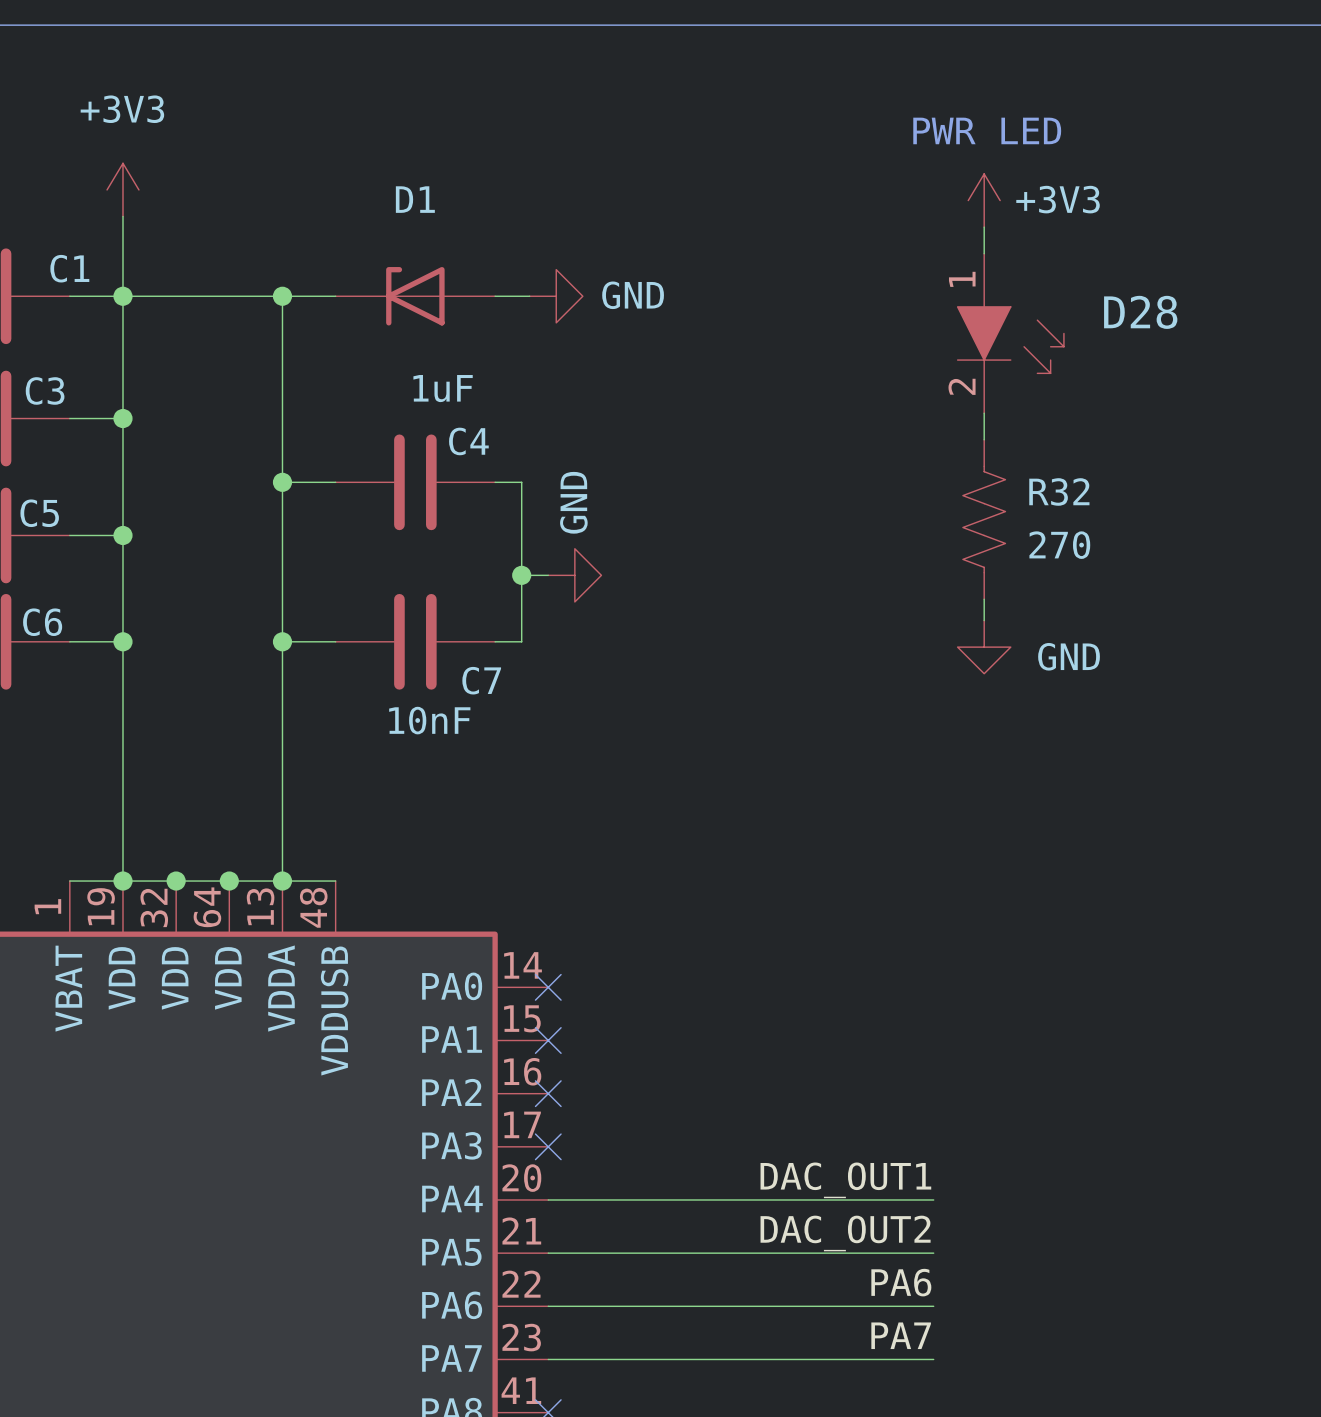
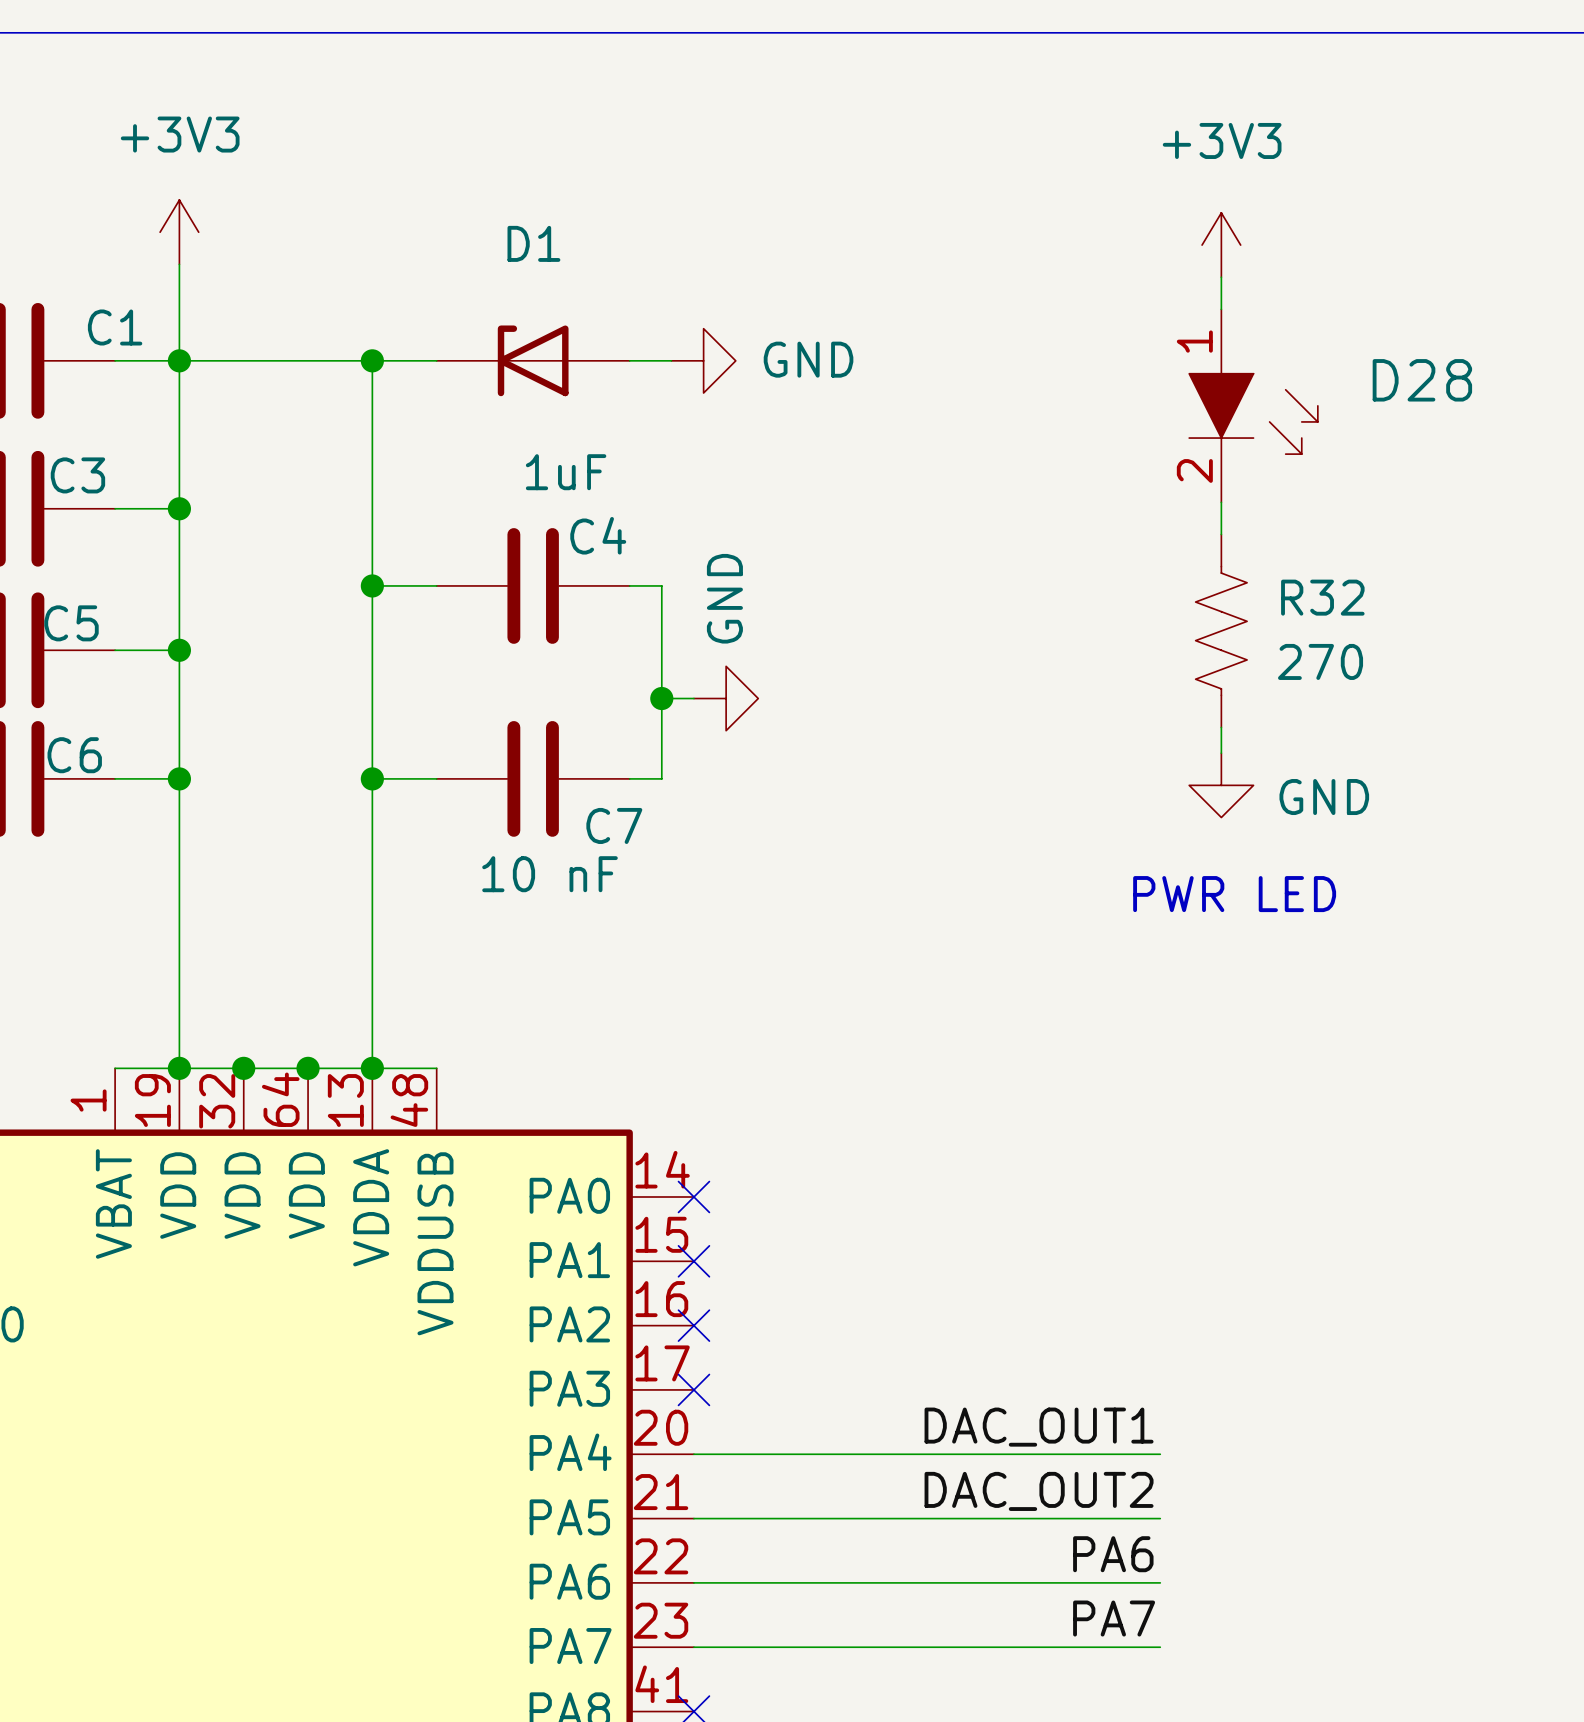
text: PWR LED (987, 130) -> none
power symbol text position: +3V3 (1058, 199) -> +3V3 (1222, 140)
C7 value: 10nF (429, 720) -> 10 nF (550, 874)
text: none -> PWR LED (1234, 894)

